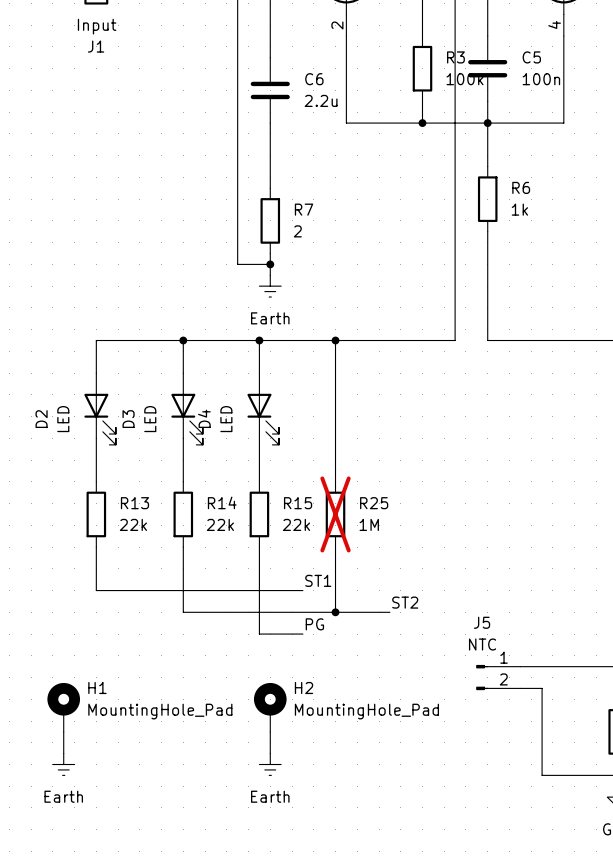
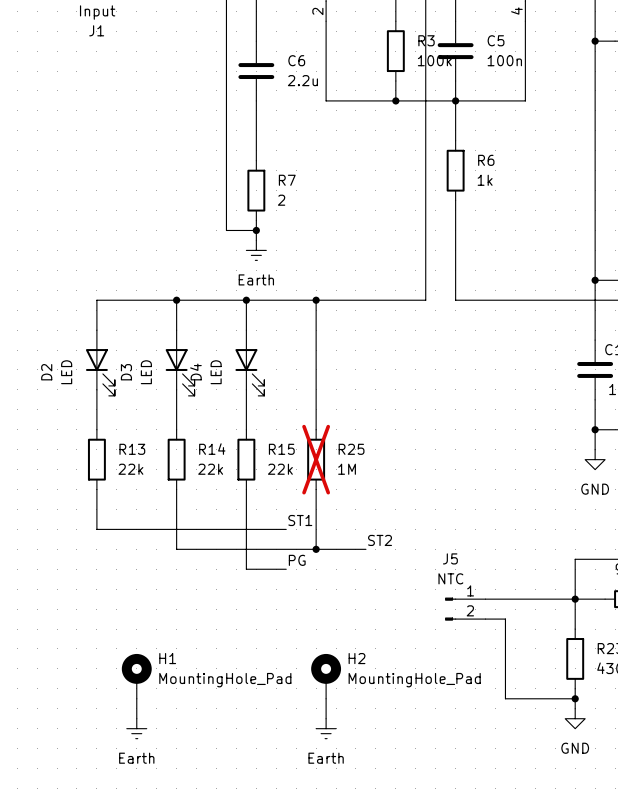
H1 position: (63, 707) -> (136, 676)
H2 position: (270, 707) -> (326, 676)
wire: (63, 731) (63, 753) -> (136, 698) (136, 718)
wire: (270, 731) (270, 753) -> (326, 698) (326, 718)
power symbol: Earth (63, 764) -> none
power symbol: Earth (270, 764) -> none
power symbol: none -> Earth (136, 728)
power symbol: none -> Earth (326, 728)

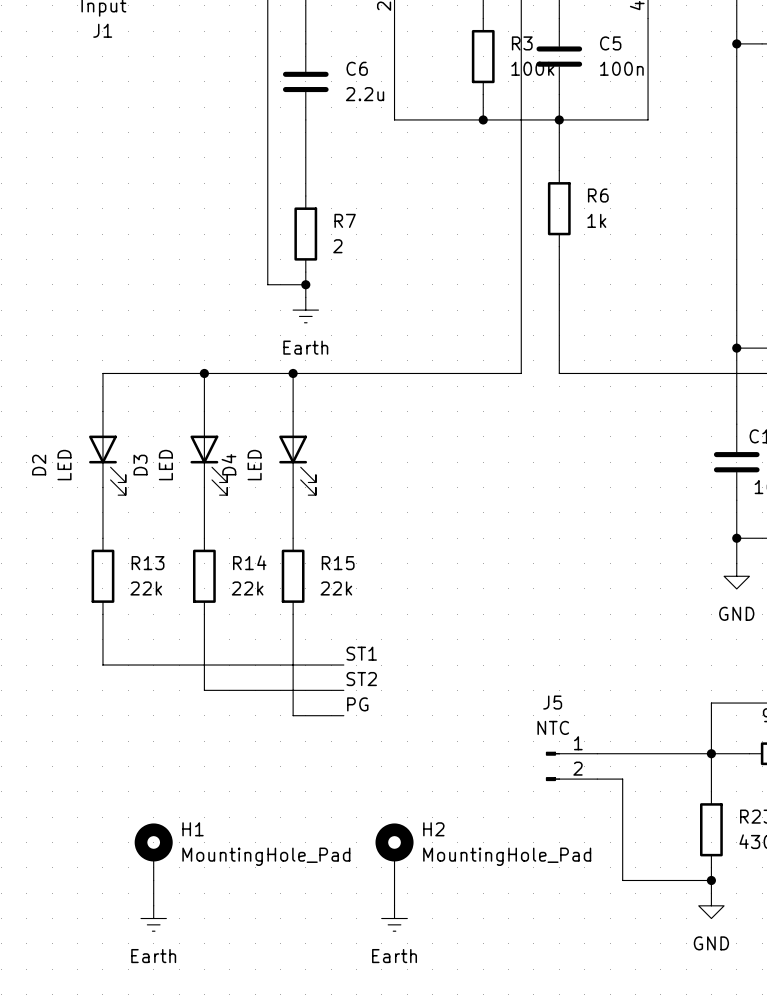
wire: (316, 300) (316, 429) -> none
junction: (316, 300) -> none
R25: 1M (316, 459) -> none
wire: (316, 489) (316, 549) -> none
label position: ST2 (380, 540) -> ST2 (361, 679)
wire: (286, 549) (365, 549) -> none
junction: (316, 549) -> none

